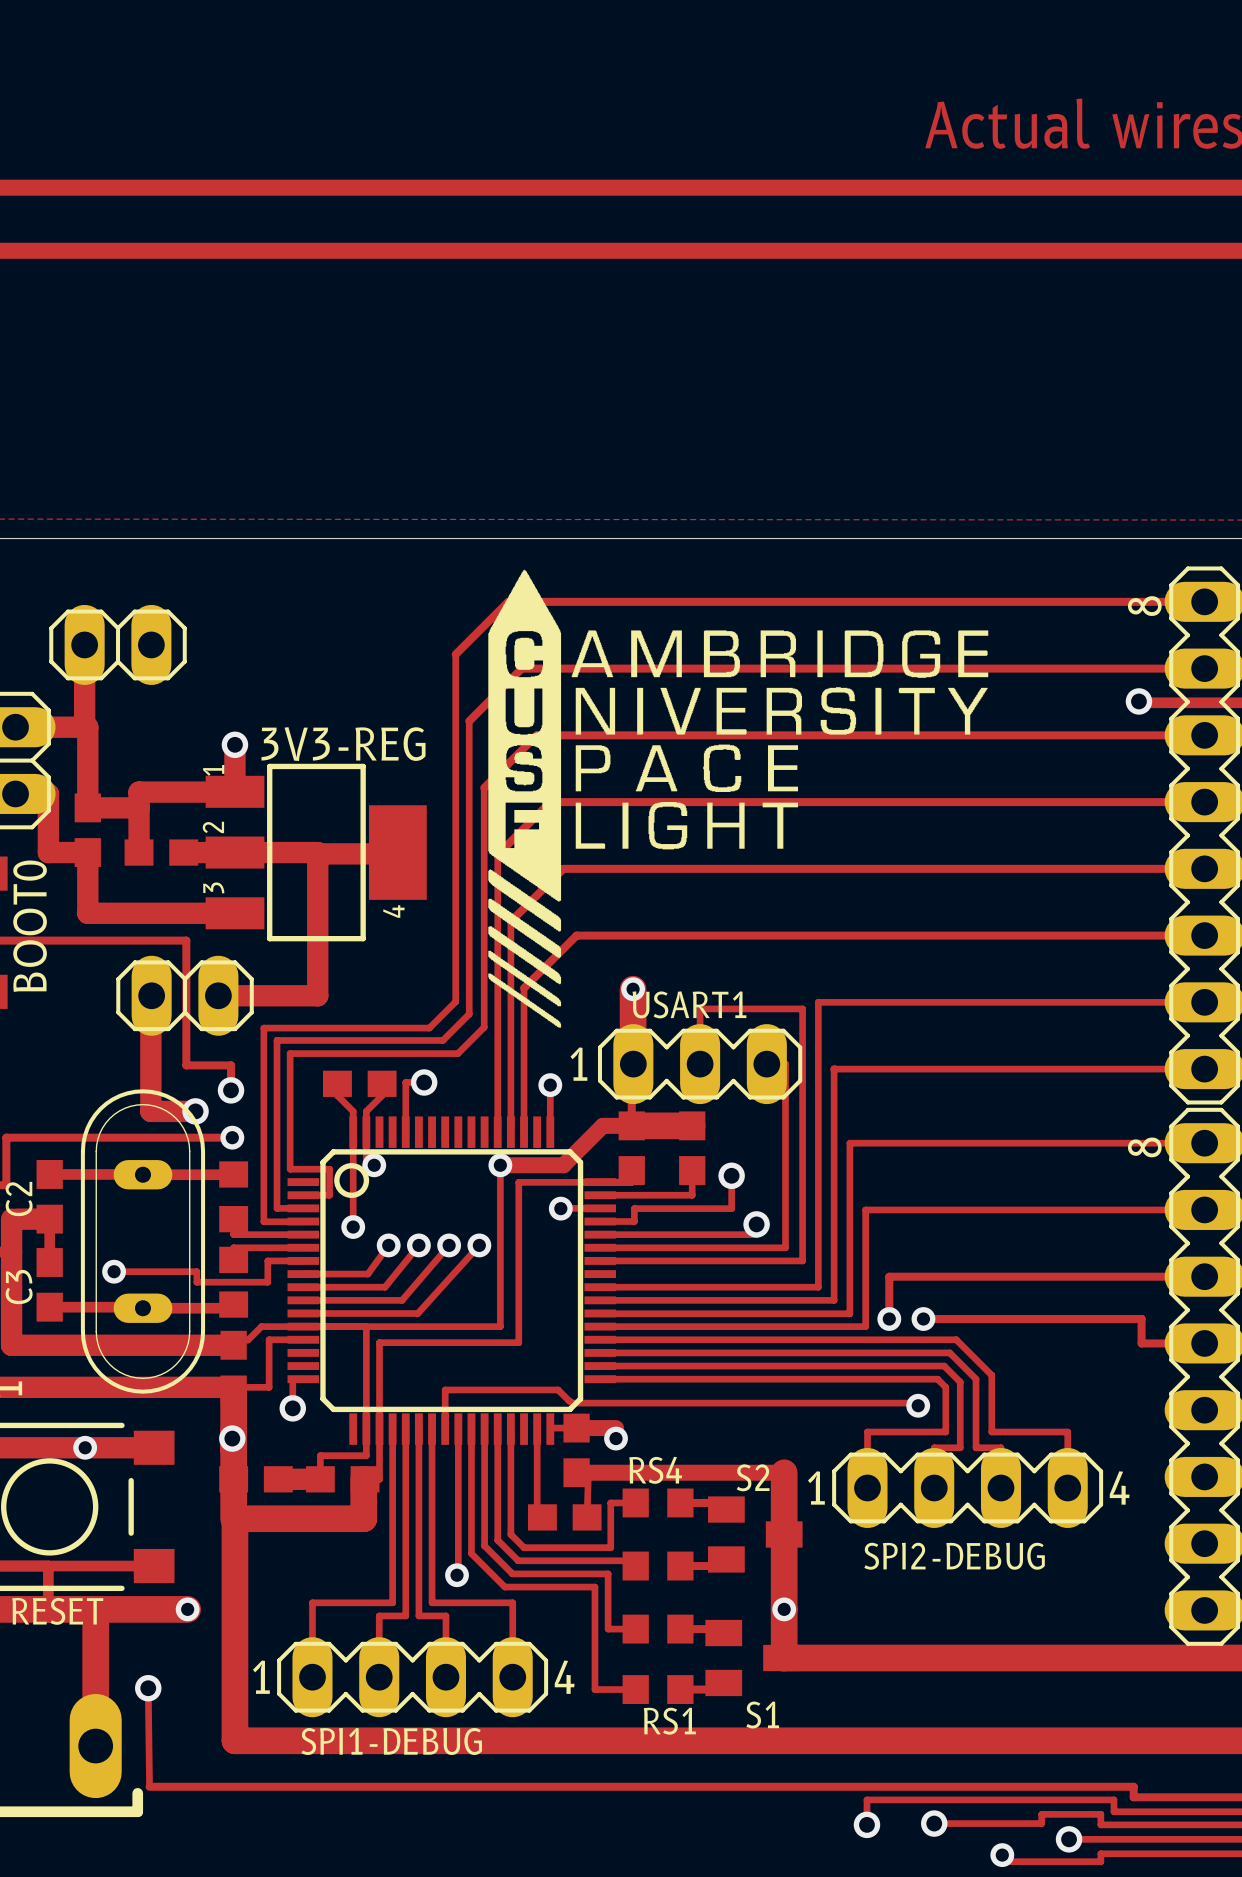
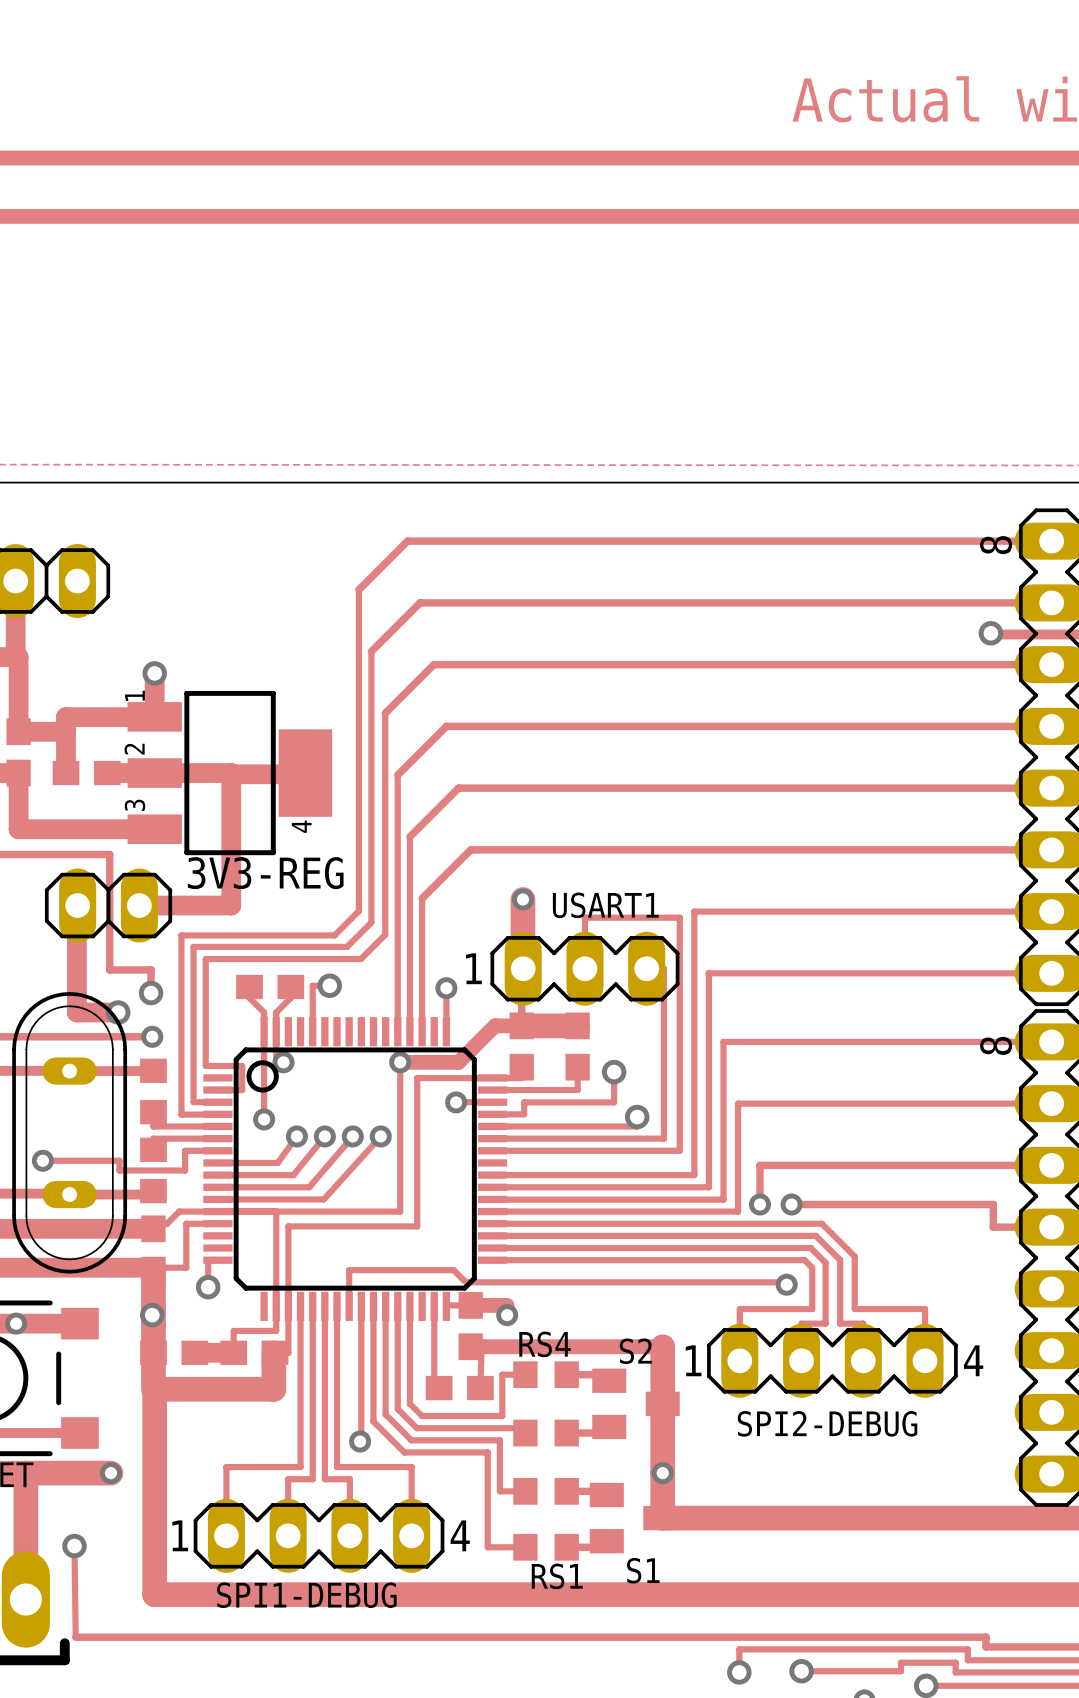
drawing: [488, 569, 989, 1028] -> none
3V3-REG name position: 3V3-REG (343, 744) -> 3V3-REG (265, 873)
USART1 name position: USART1 (689, 1004) -> USART1 (605, 905)

